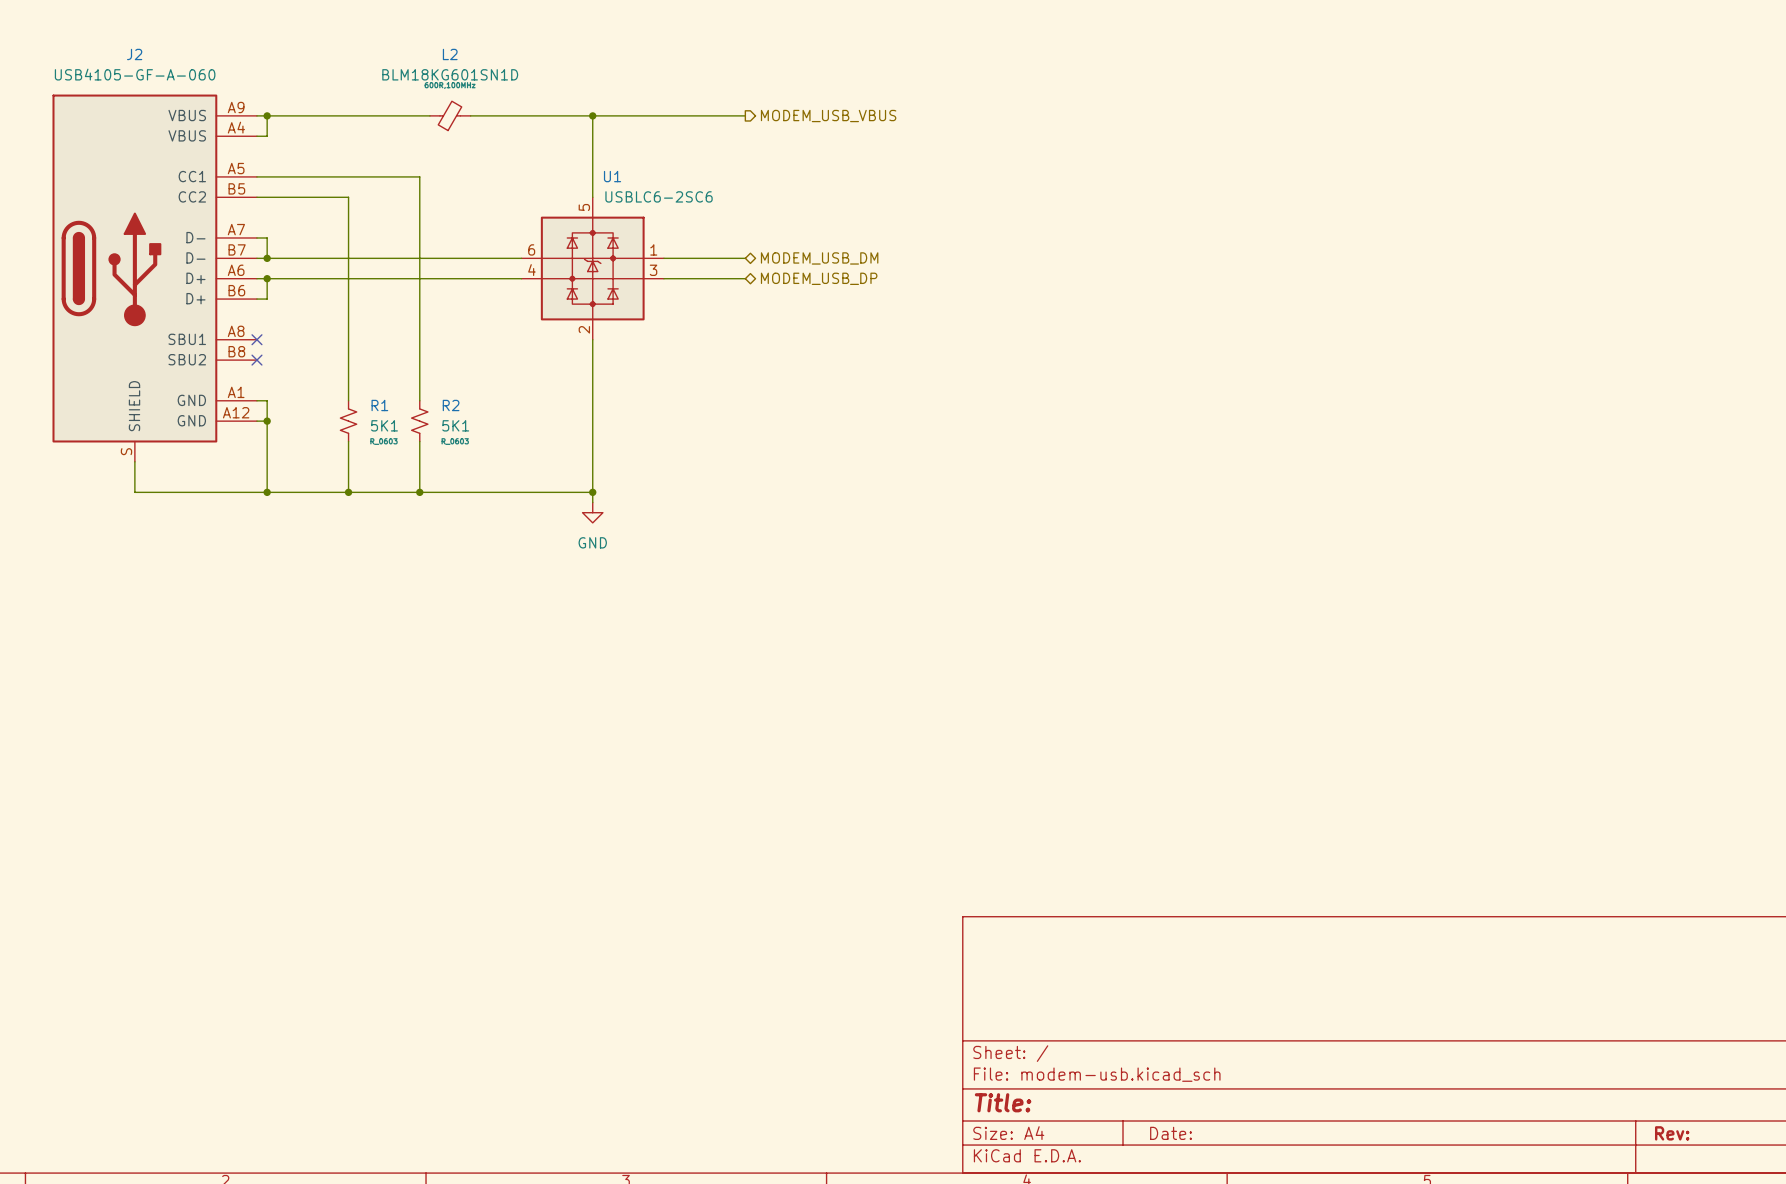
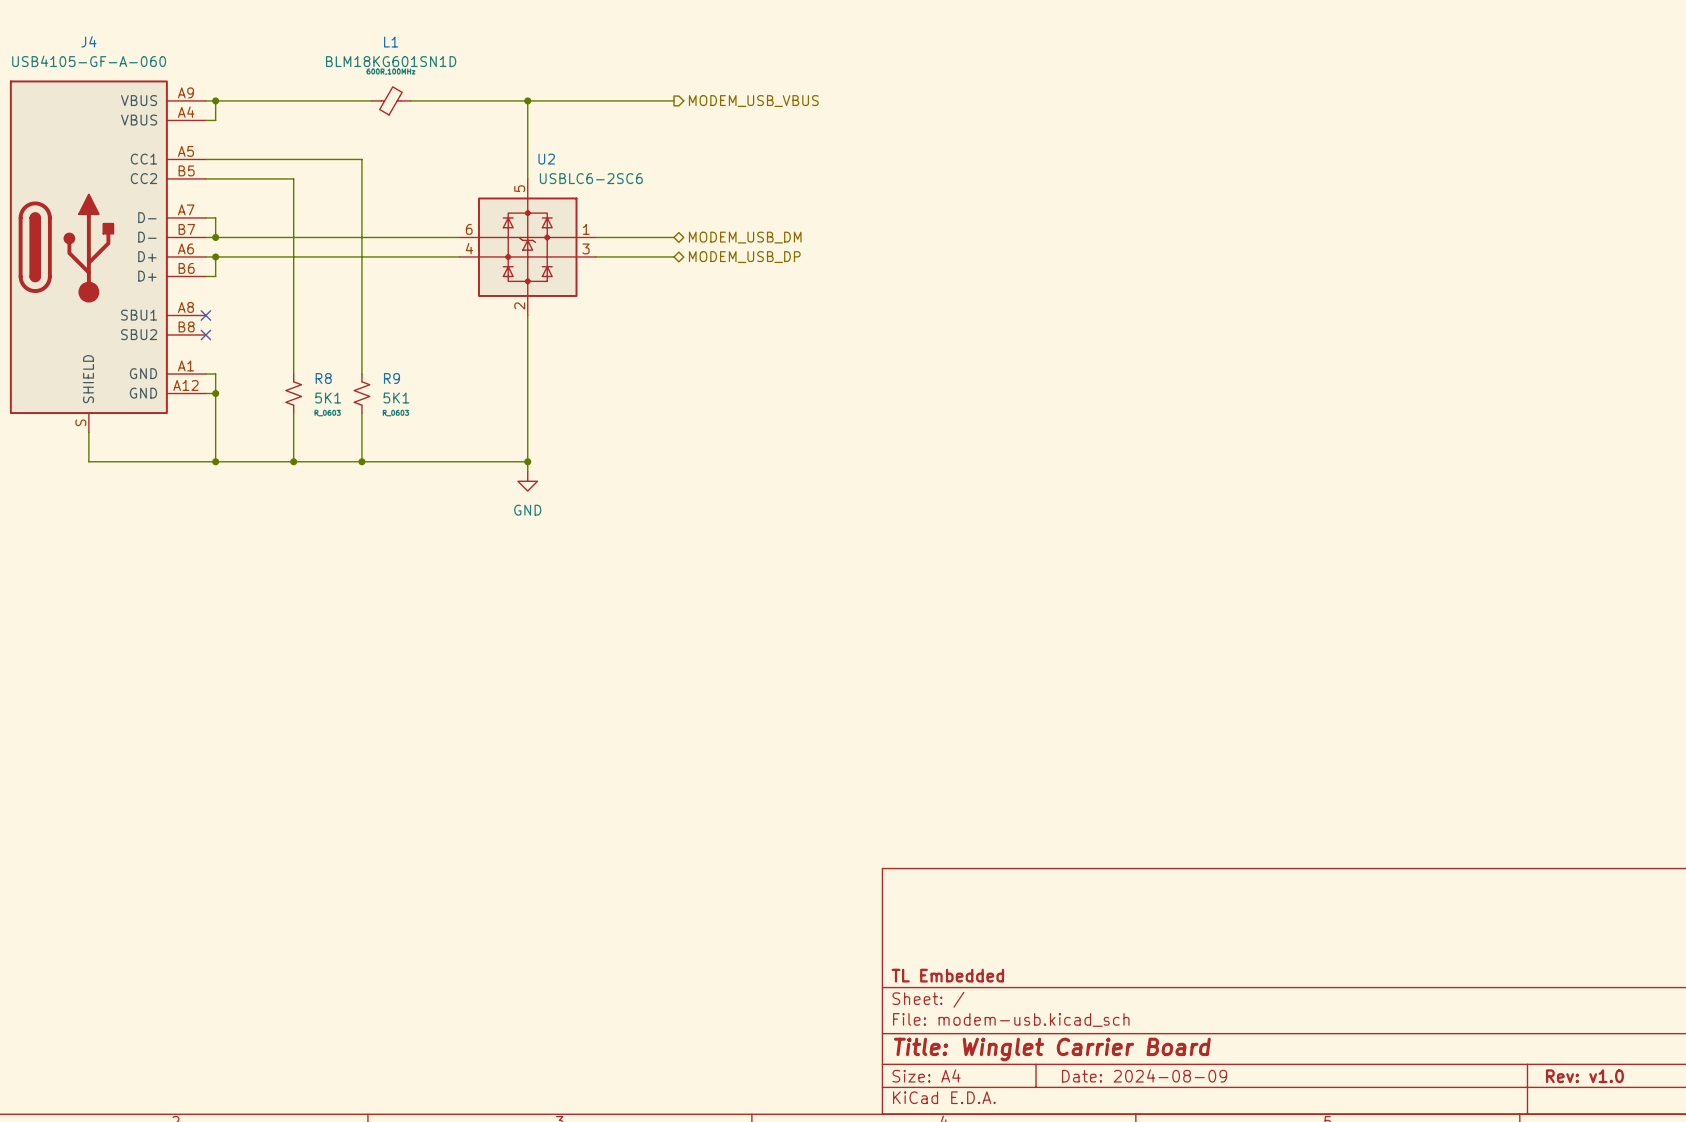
J2 name: J2 (134, 54) -> J4 (88, 41)
L2 name: L2 (450, 54) -> L1 (391, 42)
U1 name: U1 (612, 176) -> U2 (546, 159)
R1 name: R1 (379, 405) -> R8 (323, 378)
R2 name: R2 (451, 405) -> R9 (391, 378)
title block: none -> TL Embedded (947, 975)
title block: Title: (1003, 1102) -> Title: Winglet Carrier Board (1052, 1049)
title block: Date: (1171, 1133) -> Date: 2024-08-09 (1144, 1075)
title block: Rev: (1672, 1133) -> Rev: v1.0 (1584, 1076)

